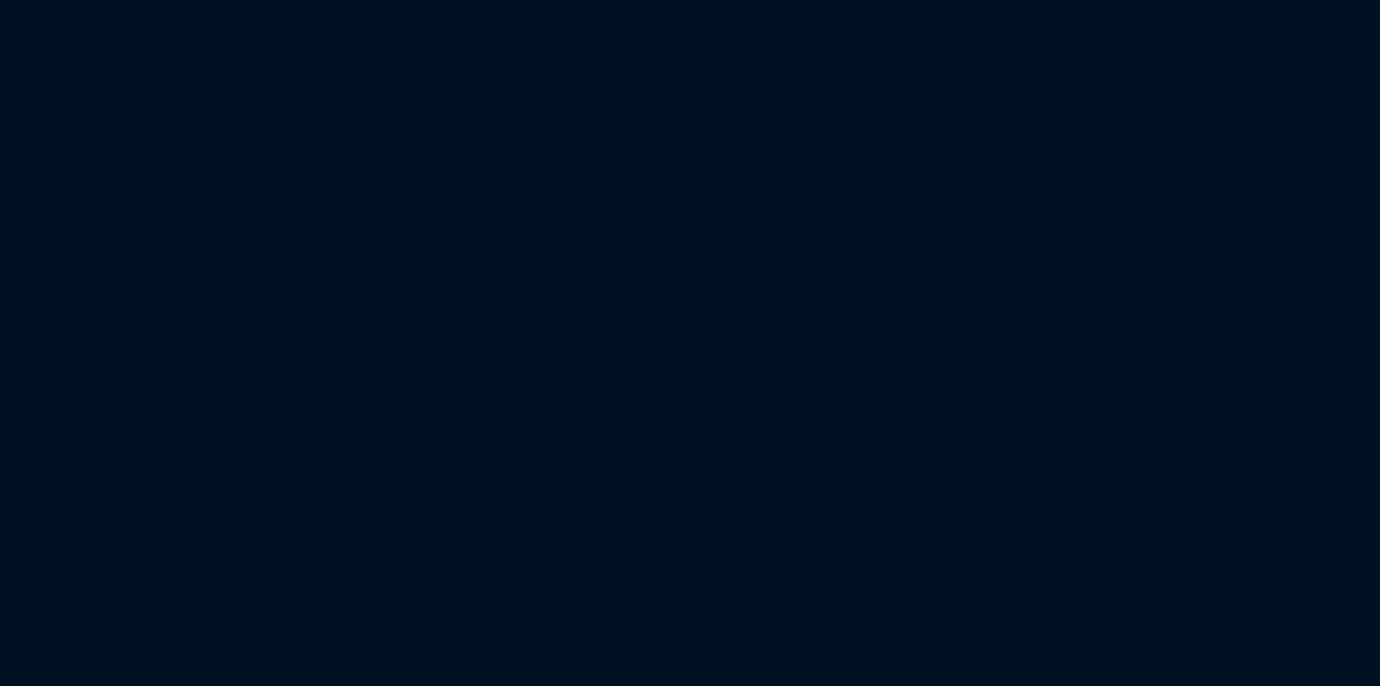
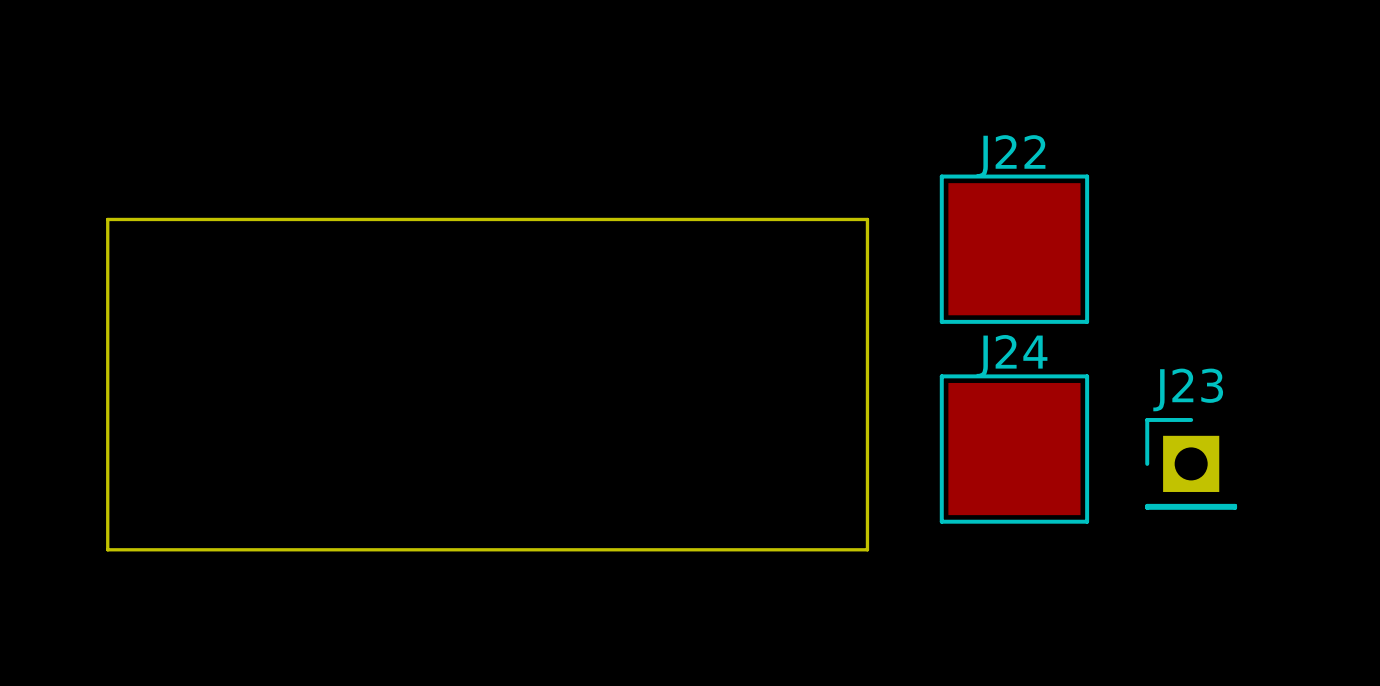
board edge: none -> (107, 219) (867, 219) (867, 549) (107, 549) (107, 219)
J22: none -> (1014, 249)
J24: none -> (1014, 449)
J23: none -> (1191, 463)

